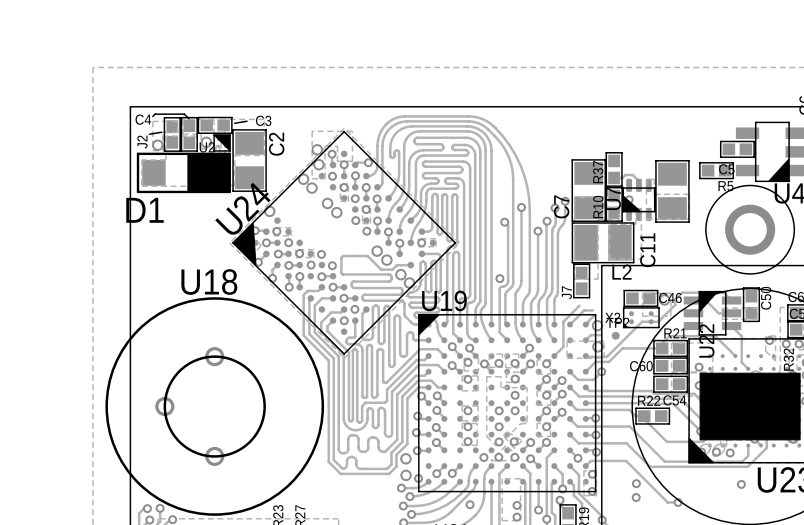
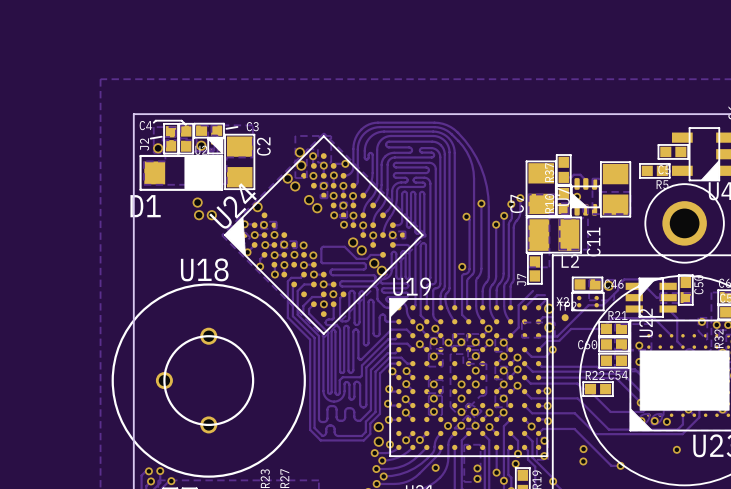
via: none -> (197, 202)
via: none -> (199, 215)
via: none -> (211, 215)

